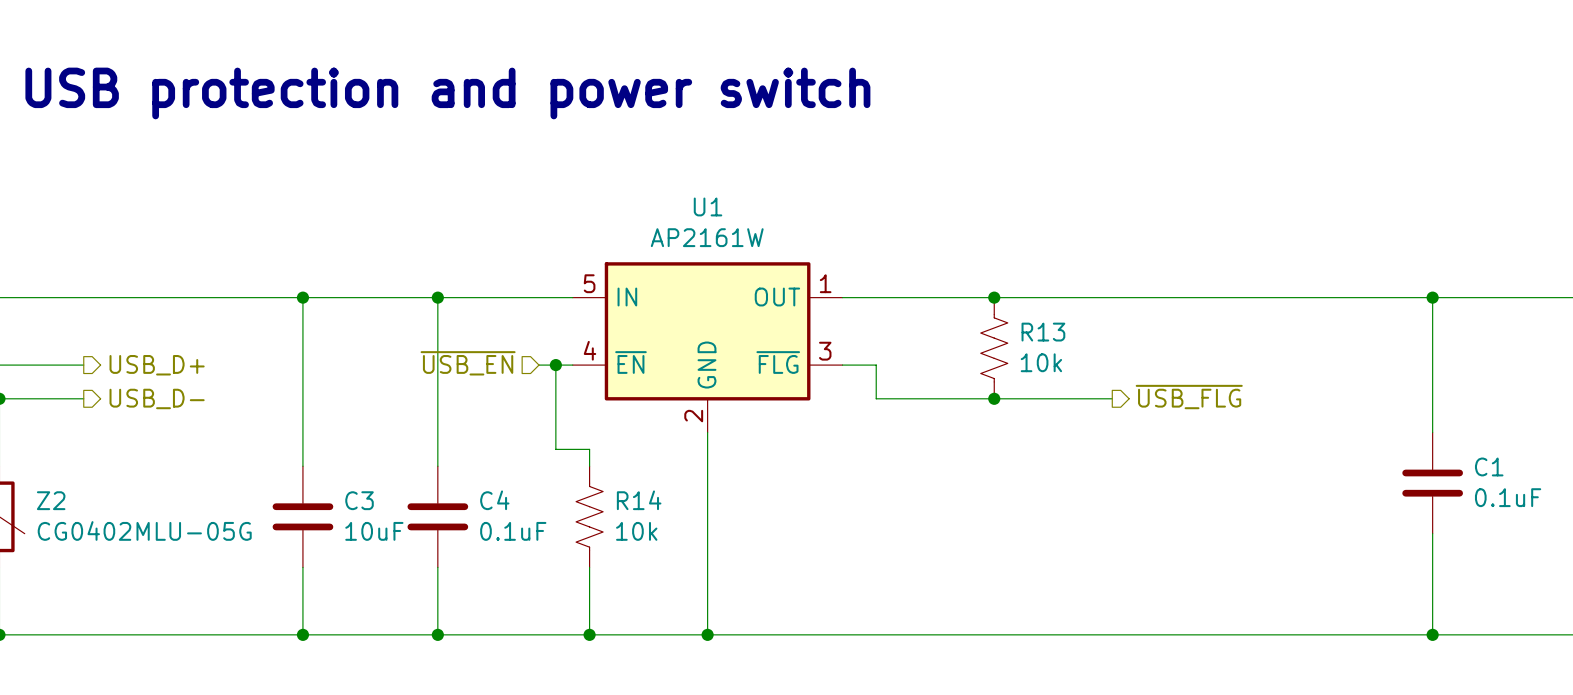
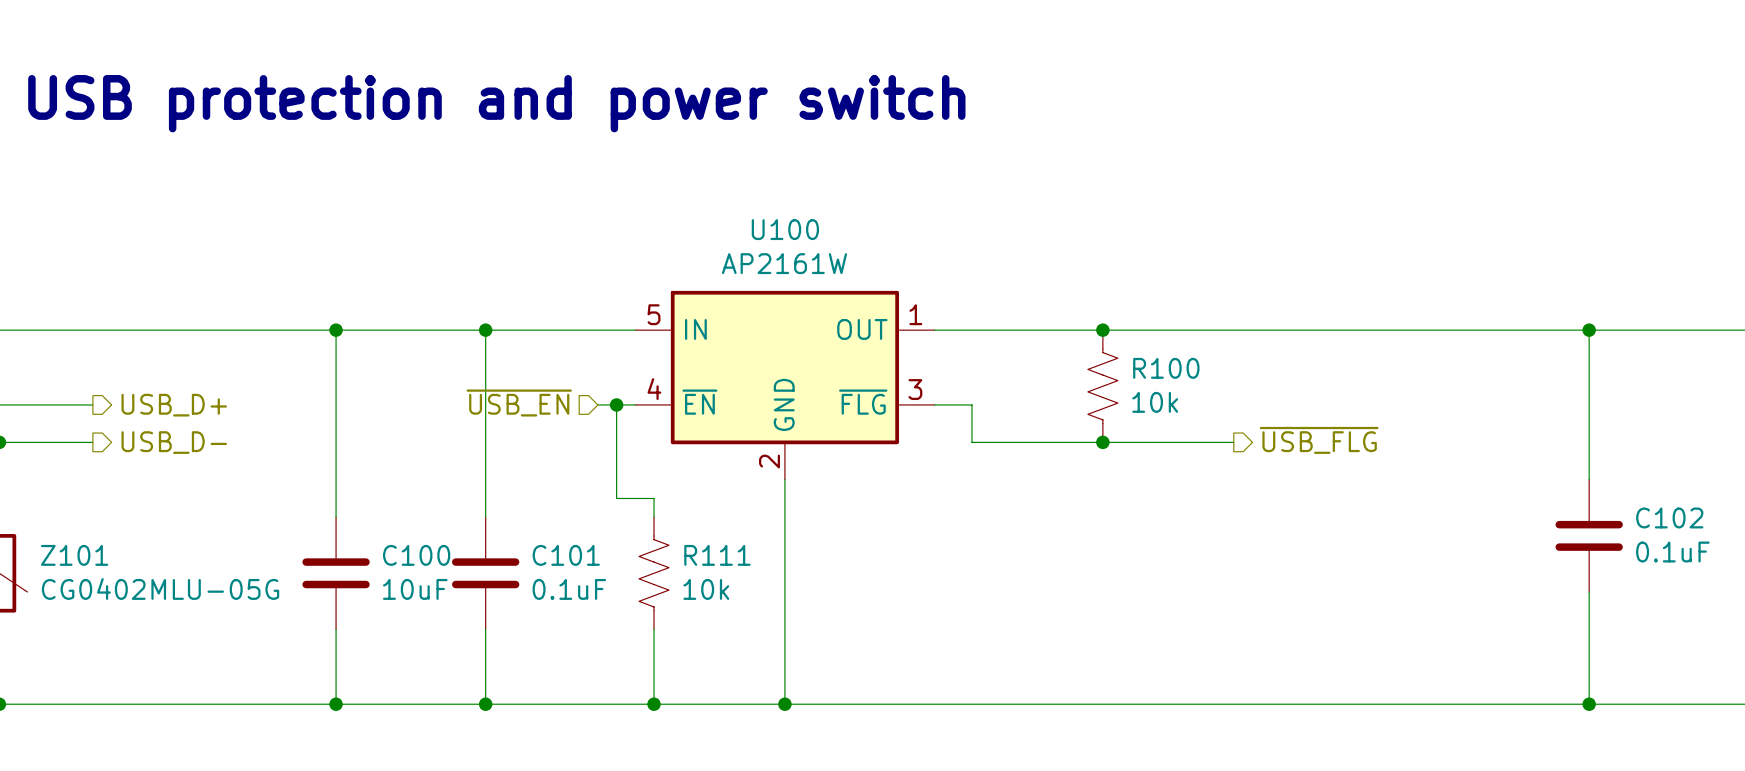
U1 name: U1 (708, 206) -> U100 (785, 229)
R13 name: R13 (1043, 332) -> R100 (1166, 368)
C1 name: C1 (1489, 466) -> C102 (1669, 517)
Z2 name: Z2 (51, 500) -> Z101 (74, 555)
C3 name: C3 (359, 500) -> C100 (416, 555)
C4 name: C4 (494, 500) -> C101 (566, 555)
R14 name: R14 (639, 500) -> R111 (717, 555)

